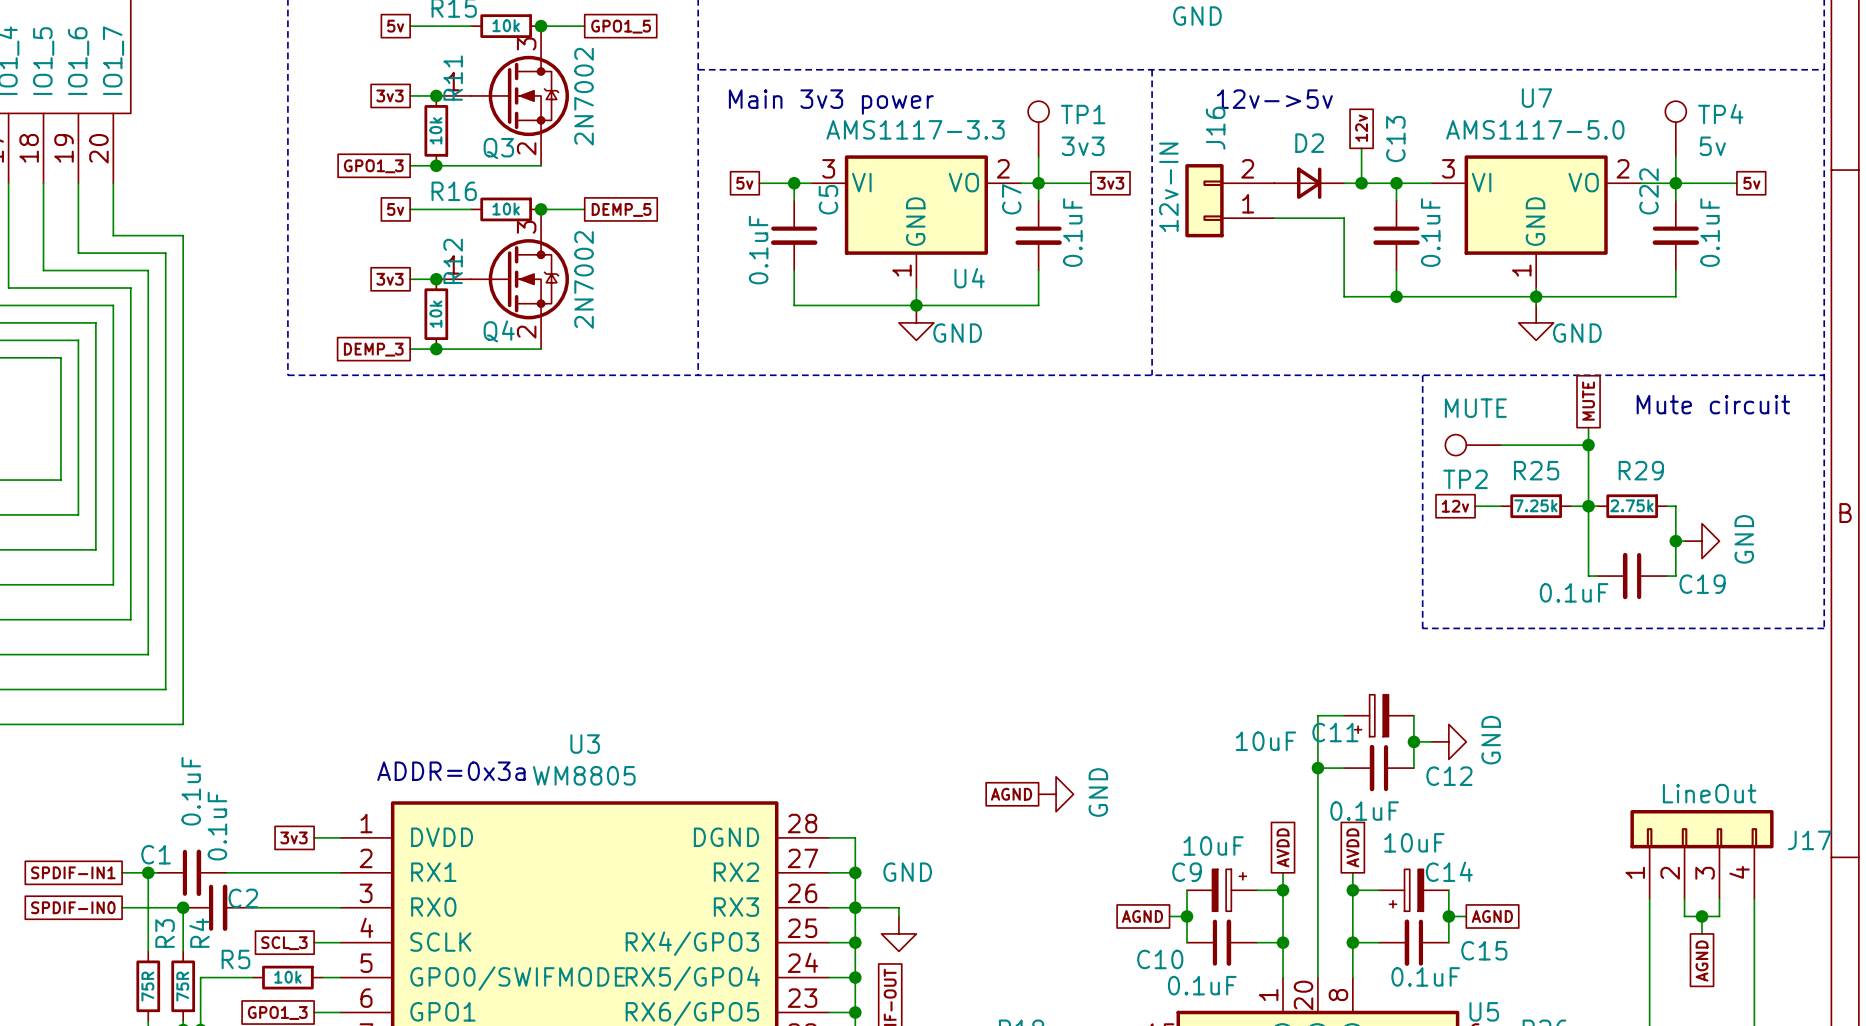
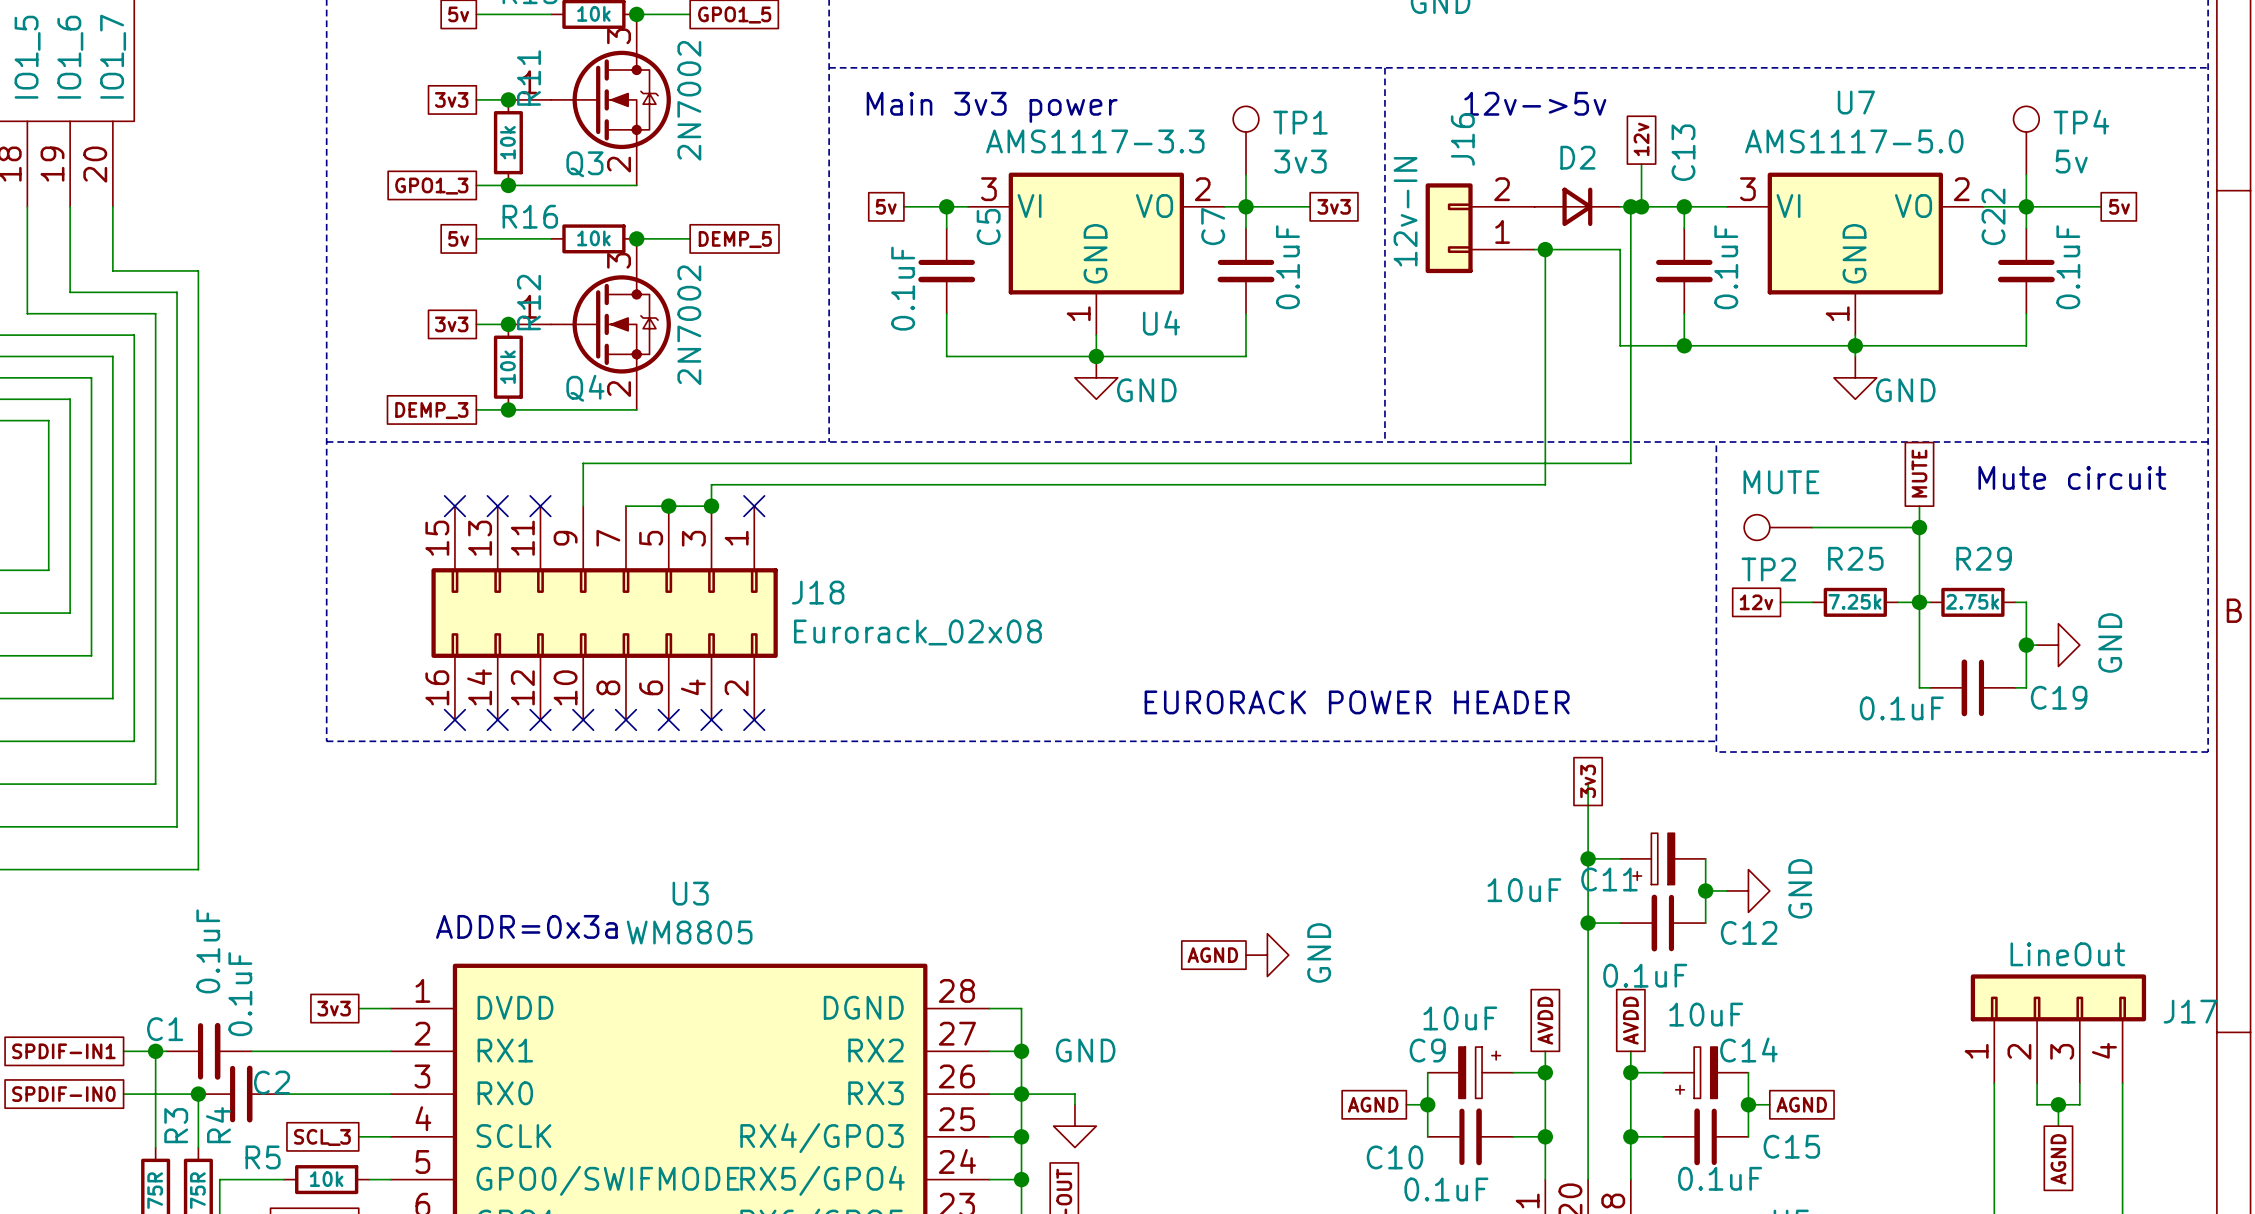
wire: none -> (1630, 206) (1630, 463) (583, 463) (583, 506)
junction: none -> (1630, 206)
wire: none -> (1545, 249) (1545, 484) (711, 484) (711, 506) (625, 506)
junction: none -> (1545, 249)
line: none -> (326, 442) (326, 741) (1716, 741)
no-connect mark: none -> (454, 506)
no-connect mark: none -> (497, 506)
no-connect mark: none -> (540, 506)
junction: none -> (668, 506)
junction: none -> (711, 506)
no-connect mark: none -> (754, 506)
J18: none -> Eurorack_02x08 (604, 613)
text: none -> EURORACK POWER HEADER (1357, 702)
no-connect mark: none -> (454, 719)
no-connect mark: none -> (497, 719)
no-connect mark: none -> (540, 719)
no-connect mark: none -> (583, 719)
no-connect mark: none -> (625, 719)
no-connect mark: none -> (668, 719)
no-connect mark: none -> (711, 719)
no-connect mark: none -> (754, 719)
global label: none -> 3v3 (1588, 781)
wire: none -> (1588, 784) (1588, 858)
junction: none -> (1588, 858)

